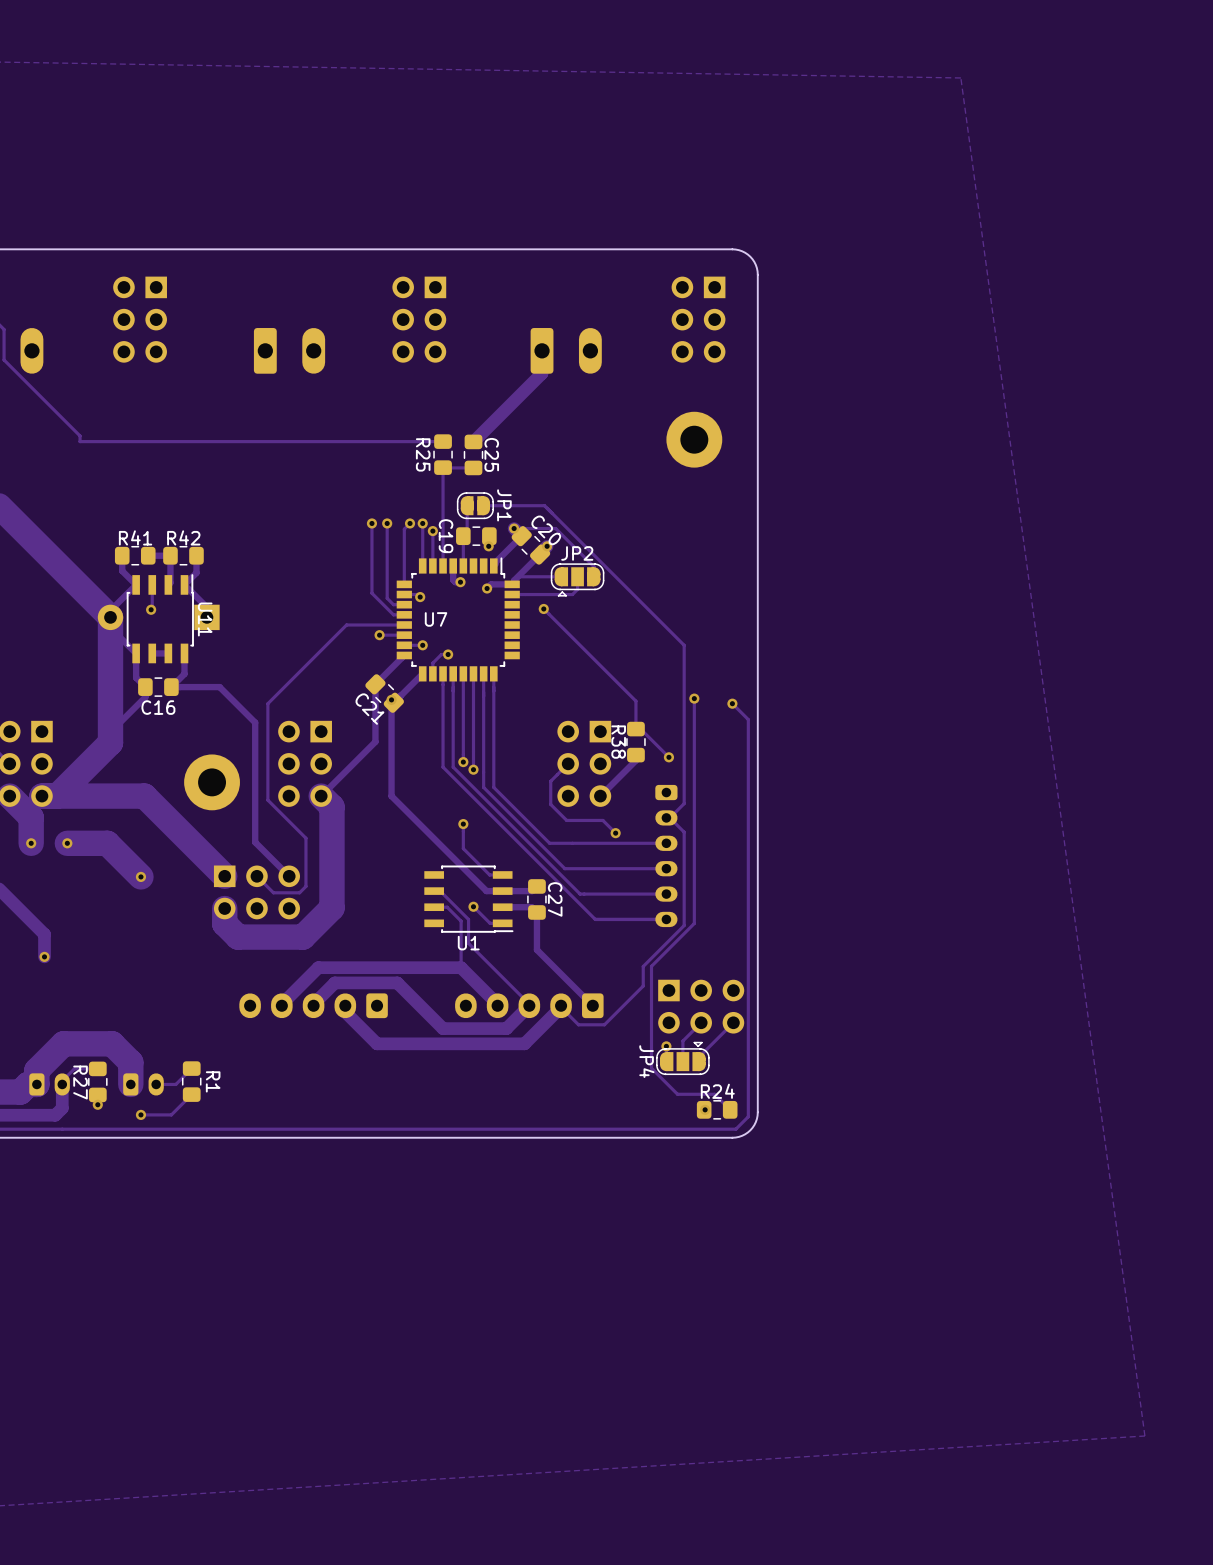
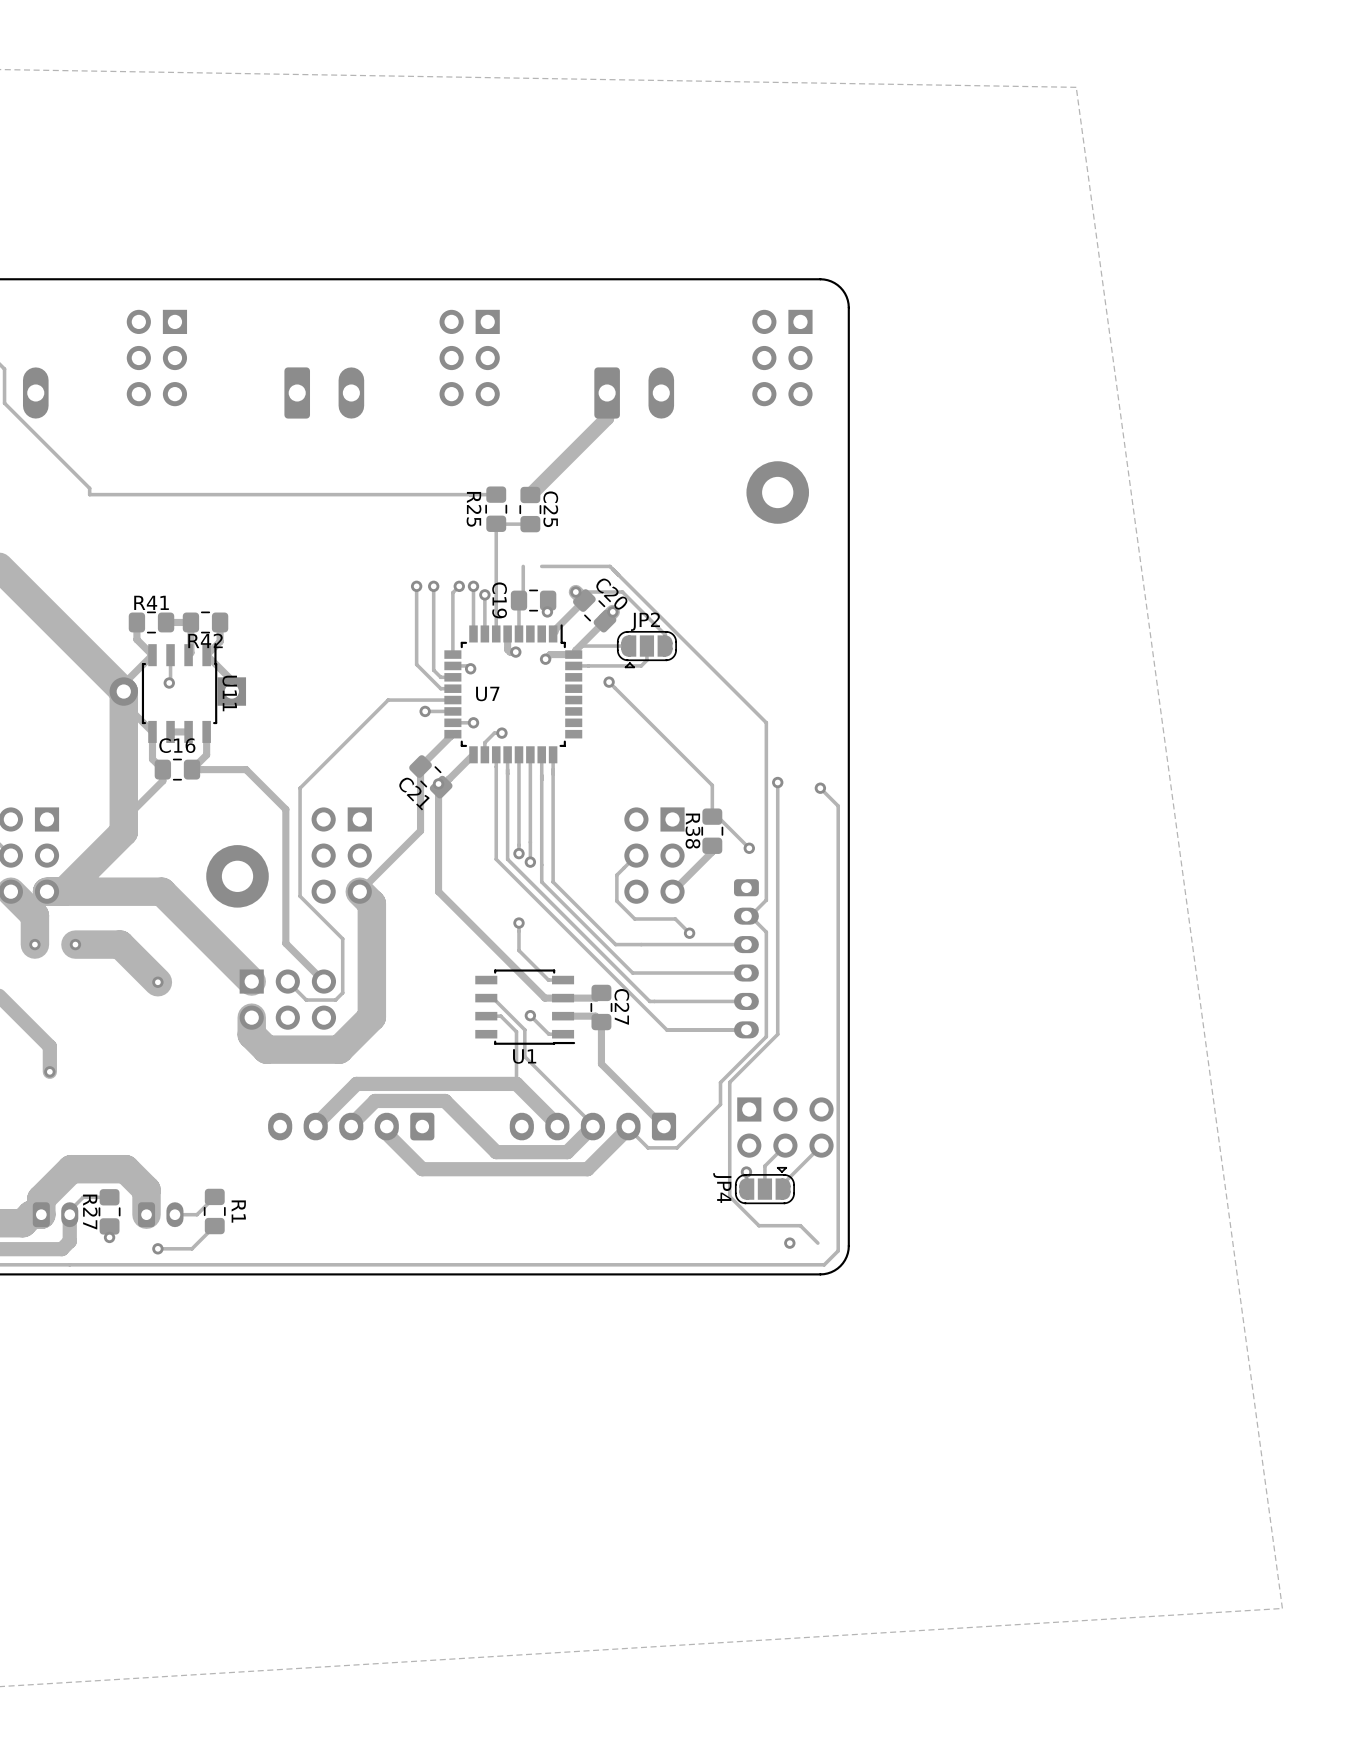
JP1: (475, 505) -> none
R42 name position: R42 (183, 537) -> R42 (205, 640)
C16 name position: C16 (158, 707) -> C16 (177, 745)
R24: (717, 1109) -> none

